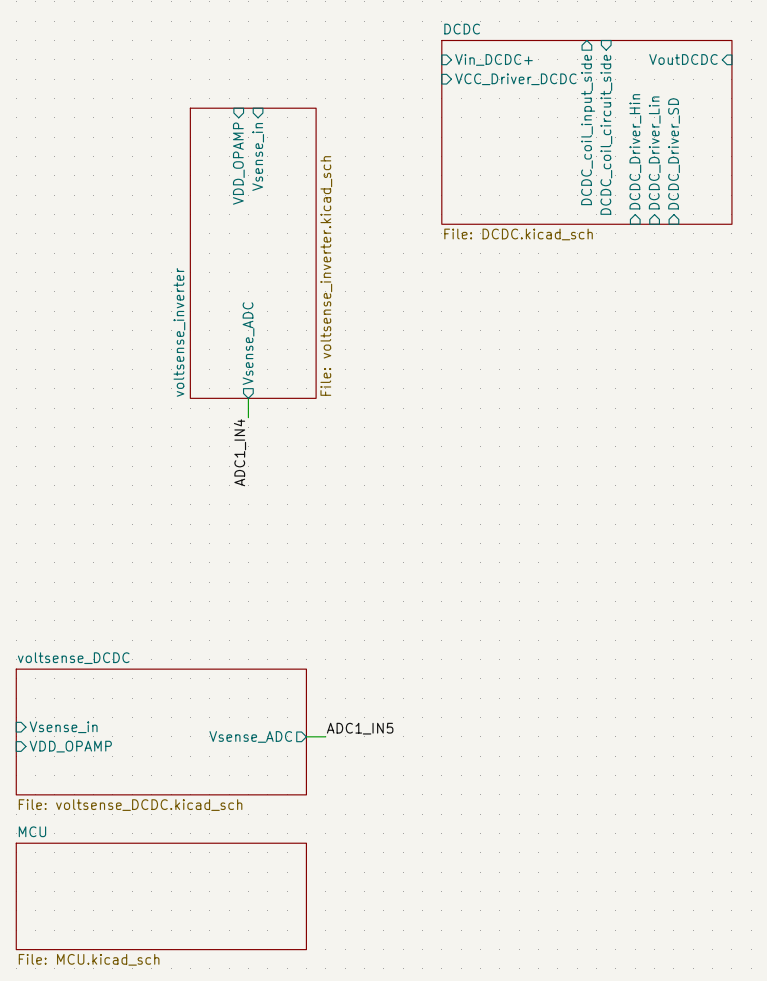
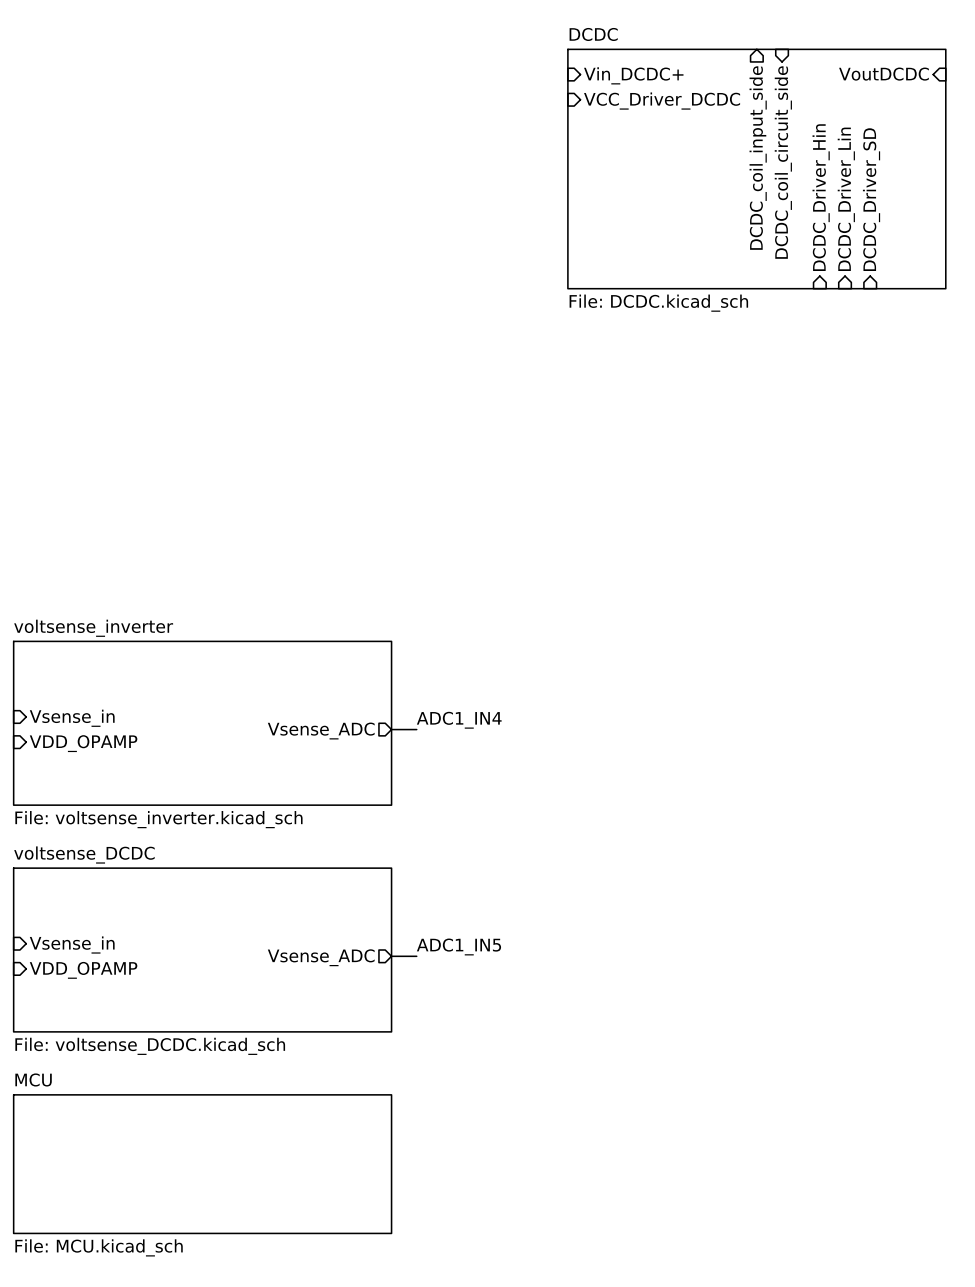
sheet pin: Vsense_in (258, 156) -> none
sheet pin: VDD_OPAMP (238, 163) -> none
sheet voltsense_inverter: File: voltsense_inverter.kicad_sch (253, 253) -> none
sheet pin rotation: 0° (248, 343) -> 90° counterclockwise (321, 731)
sheet pin position: Vsense_ADC (248, 343) -> Vsense_ADC (321, 731)
wire: (248, 398) (248, 417) -> none
label rotation: 0° (239, 452) -> 90° clockwise (459, 720)
label position: ADC1_IN4 (239, 452) -> ADC1_IN4 (459, 720)
sheet pin: none -> Vsense_in (72, 718)
sheet voltsense_inverter: none -> File: voltsense_inverter.kicad_sch (202, 723)
wire: none -> (391, 729) (416, 729)
sheet pin: none -> VDD_OPAMP (83, 743)

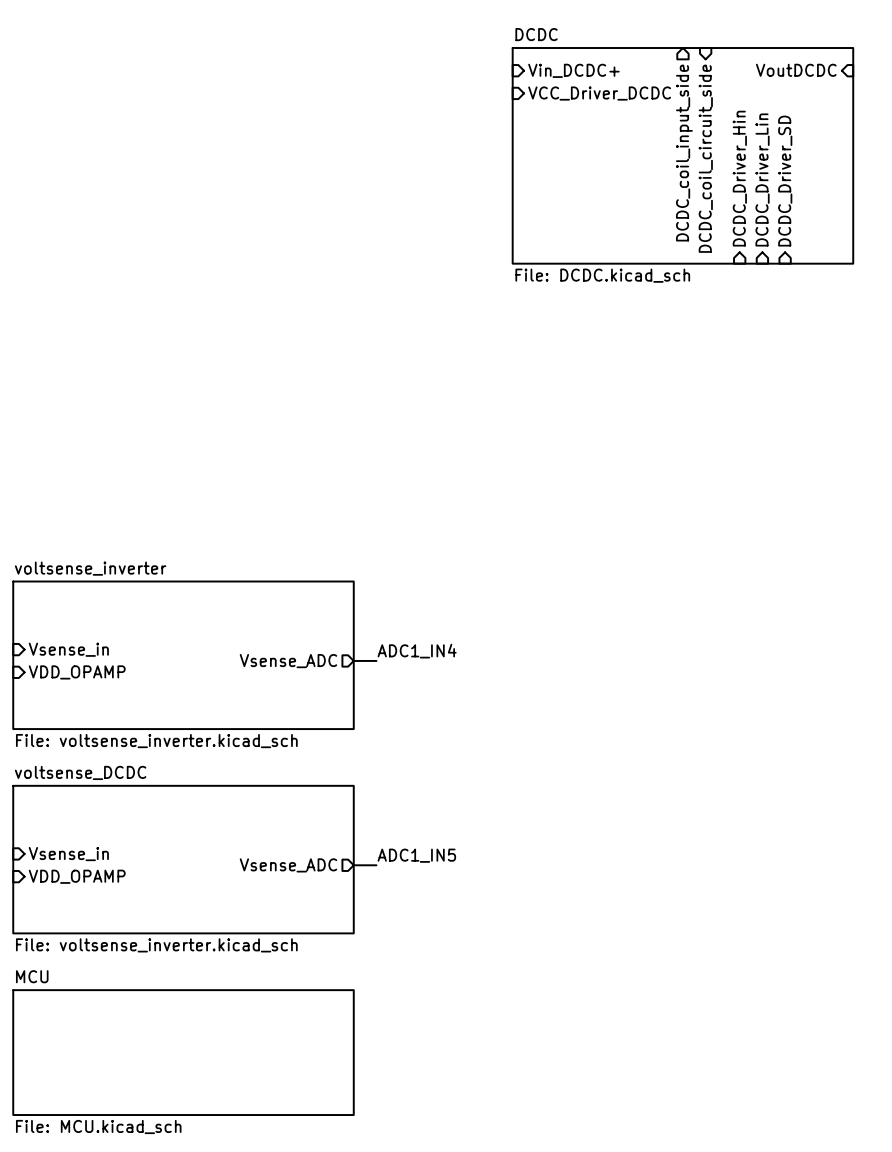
sheet voltsense_DCDC value: File: voltsense_DCDC.kicad_sch (150, 1046) -> File: voltsense_inverter.kicad_sch (156, 945)

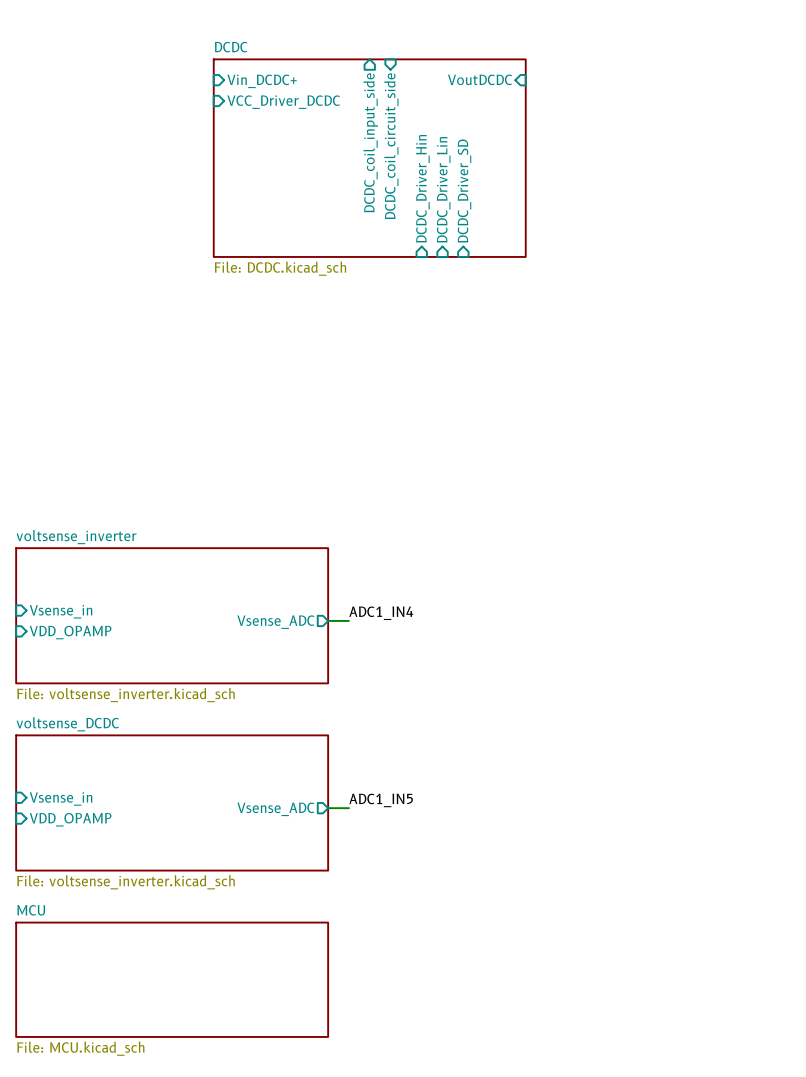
sheet pin: none -> Vin_DCDC+ (262, 81)
sheet pin: none -> VoutDCDC (480, 79)
sheet pin: Vin_DCDC+ (573, 70) -> none
sheet pin: VoutDCDC (796, 70) -> none
sheet pin: none -> VCC_Driver_DCDC (283, 102)
sheet pin: VCC_Driver_DCDC (599, 93) -> none
sheet pin: none -> DCDC_coil_input_side (370, 142)
sheet pin: DCDC_coil_input_side (684, 153) -> none
sheet DCDC: none -> File: DCDC.kicad_sch (369, 158)
sheet DCDC: File: DCDC.kicad_sch (682, 155) -> none
sheet pin: none -> DCDC_coil_circuit_side (391, 146)
sheet pin: DCDC_coil_circuit_side (705, 158) -> none
sheet pin: none -> DCDC_Driver_Hin (422, 188)
sheet pin: DCDC_Driver_Hin (739, 178) -> none
sheet pin: none -> DCDC_Driver_Lin (443, 189)
sheet pin: DCDC_Driver_Lin (762, 179) -> none
sheet pin: none -> DCDC_Driver_SD (464, 191)
sheet pin: DCDC_Driver_SD (785, 181) -> none

